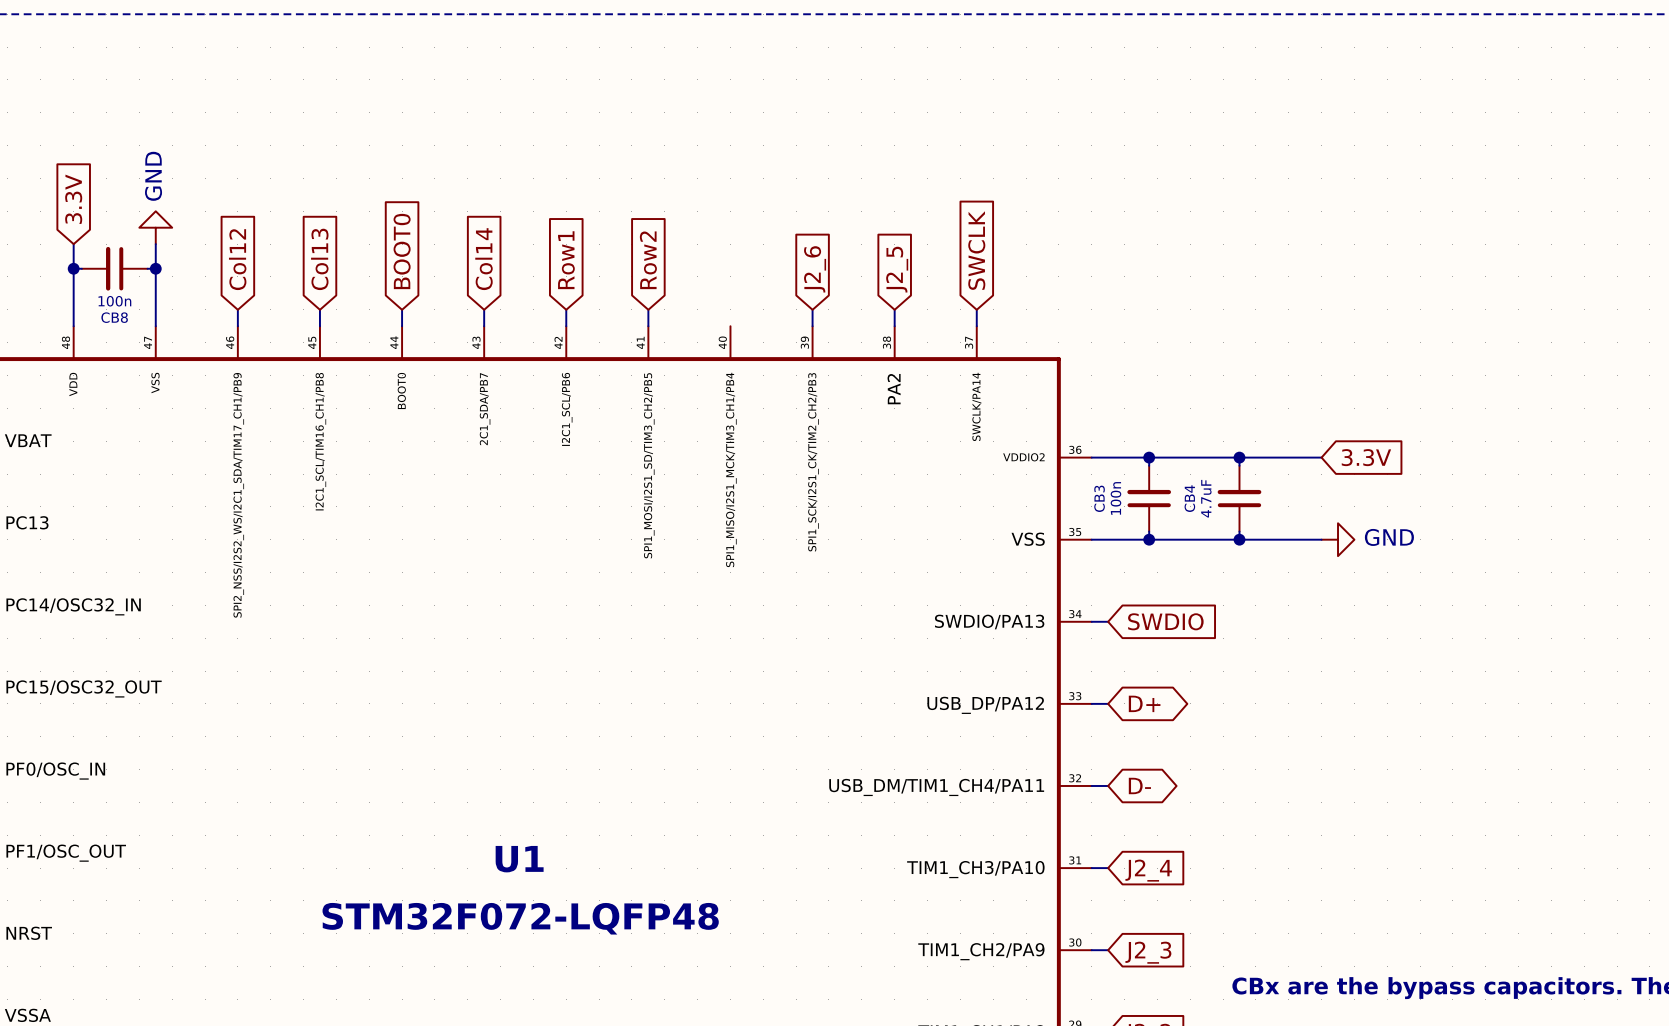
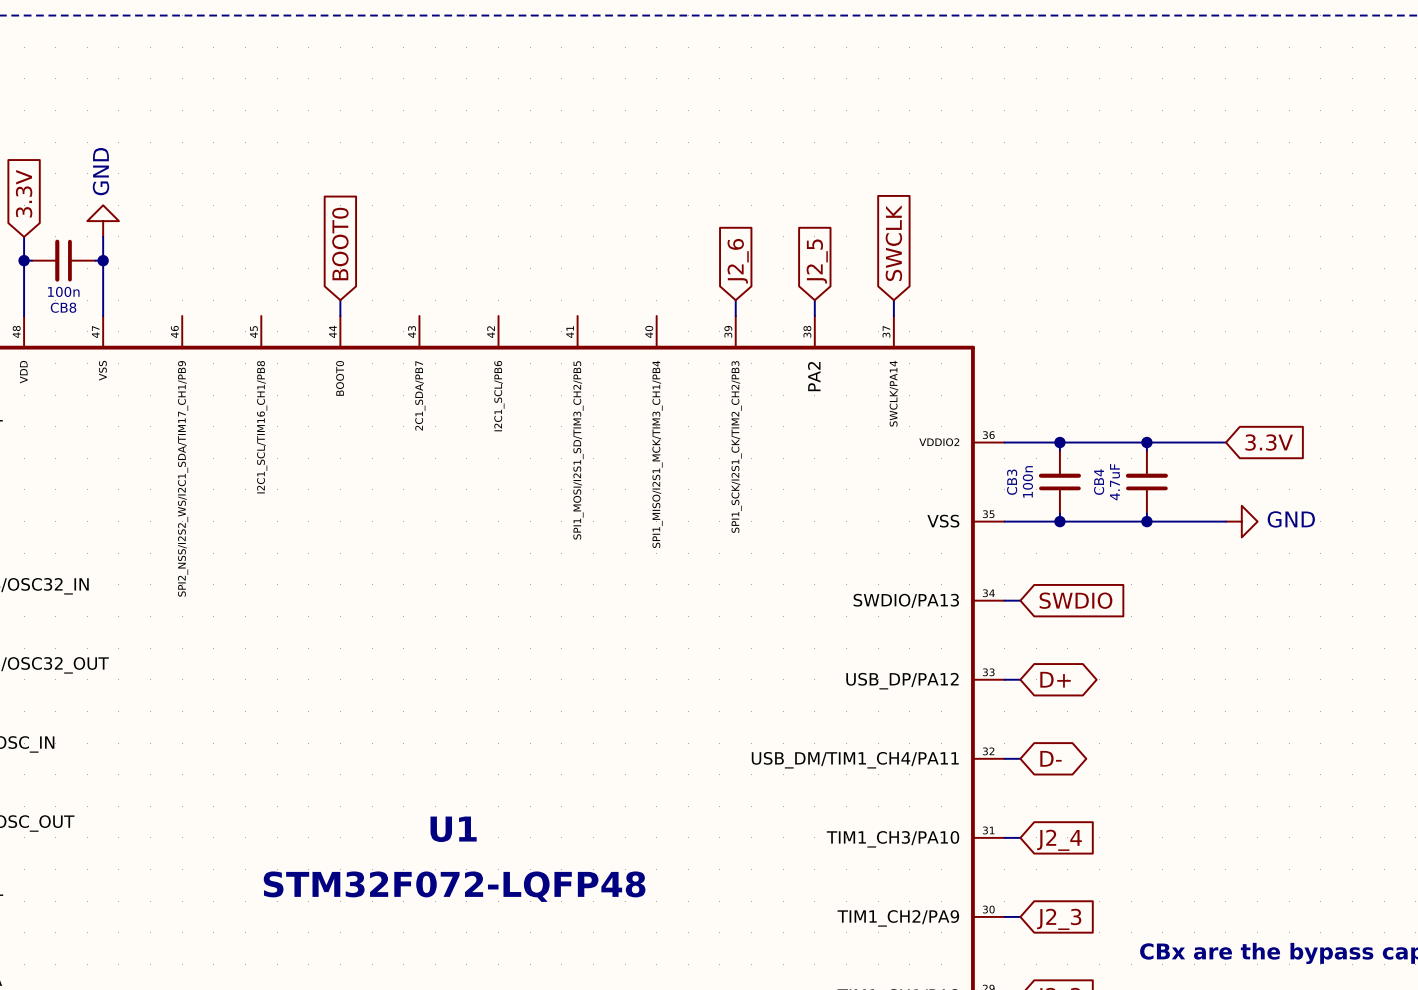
global label: Col12 (237, 259) -> none
global label: Col13 (319, 259) -> none
global label: Col14 (483, 259) -> none
global label: Row1 (566, 260) -> none
global label: Row2 (648, 260) -> none
wire: (237, 309) (237, 326) -> none
wire: (319, 309) (319, 326) -> none
wire: (484, 309) (484, 326) -> none
wire: (566, 309) (566, 326) -> none
wire: (648, 309) (648, 326) -> none

